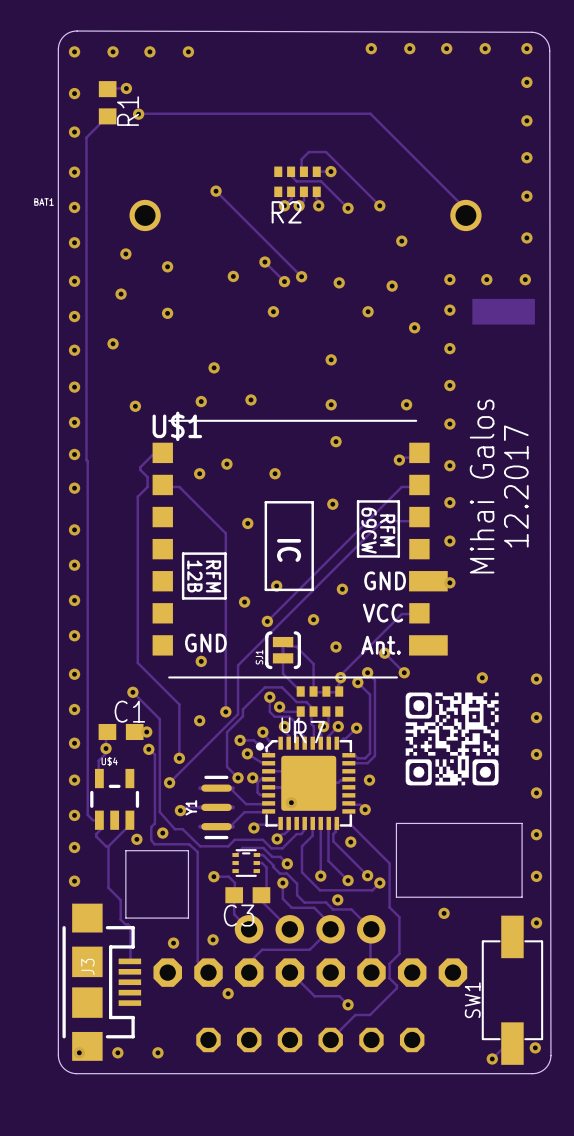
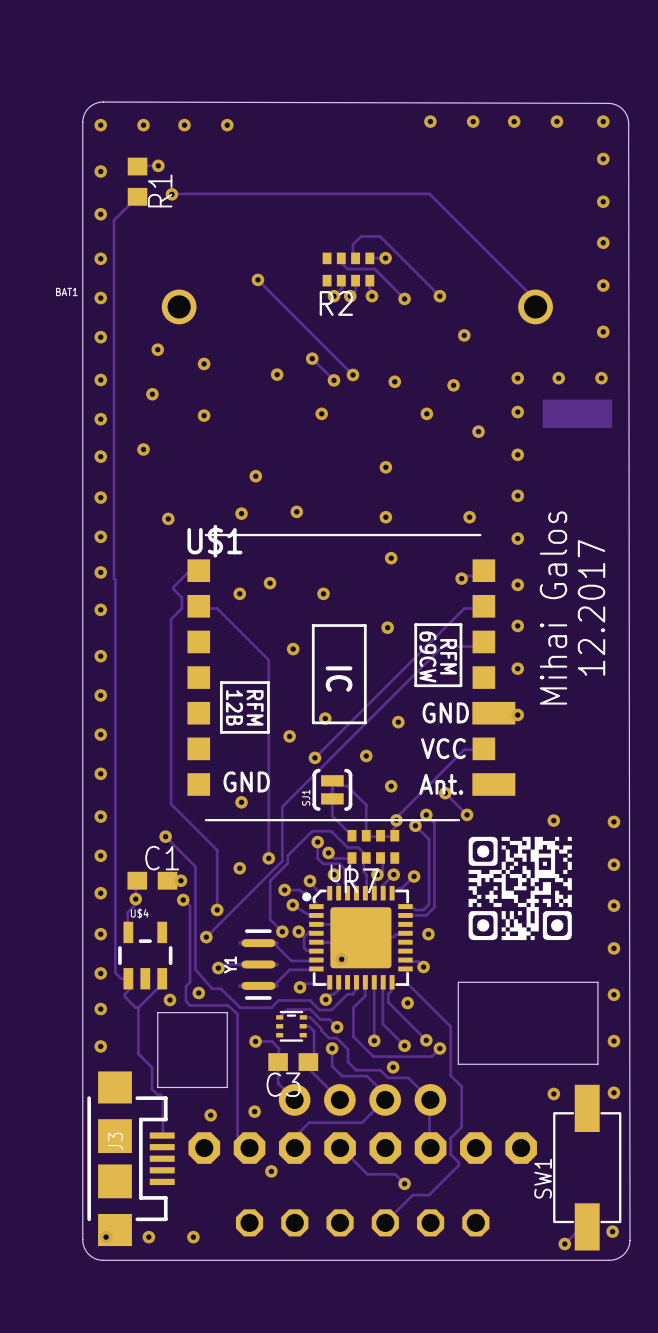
via position: (444, 913) -> (553, 1093)

